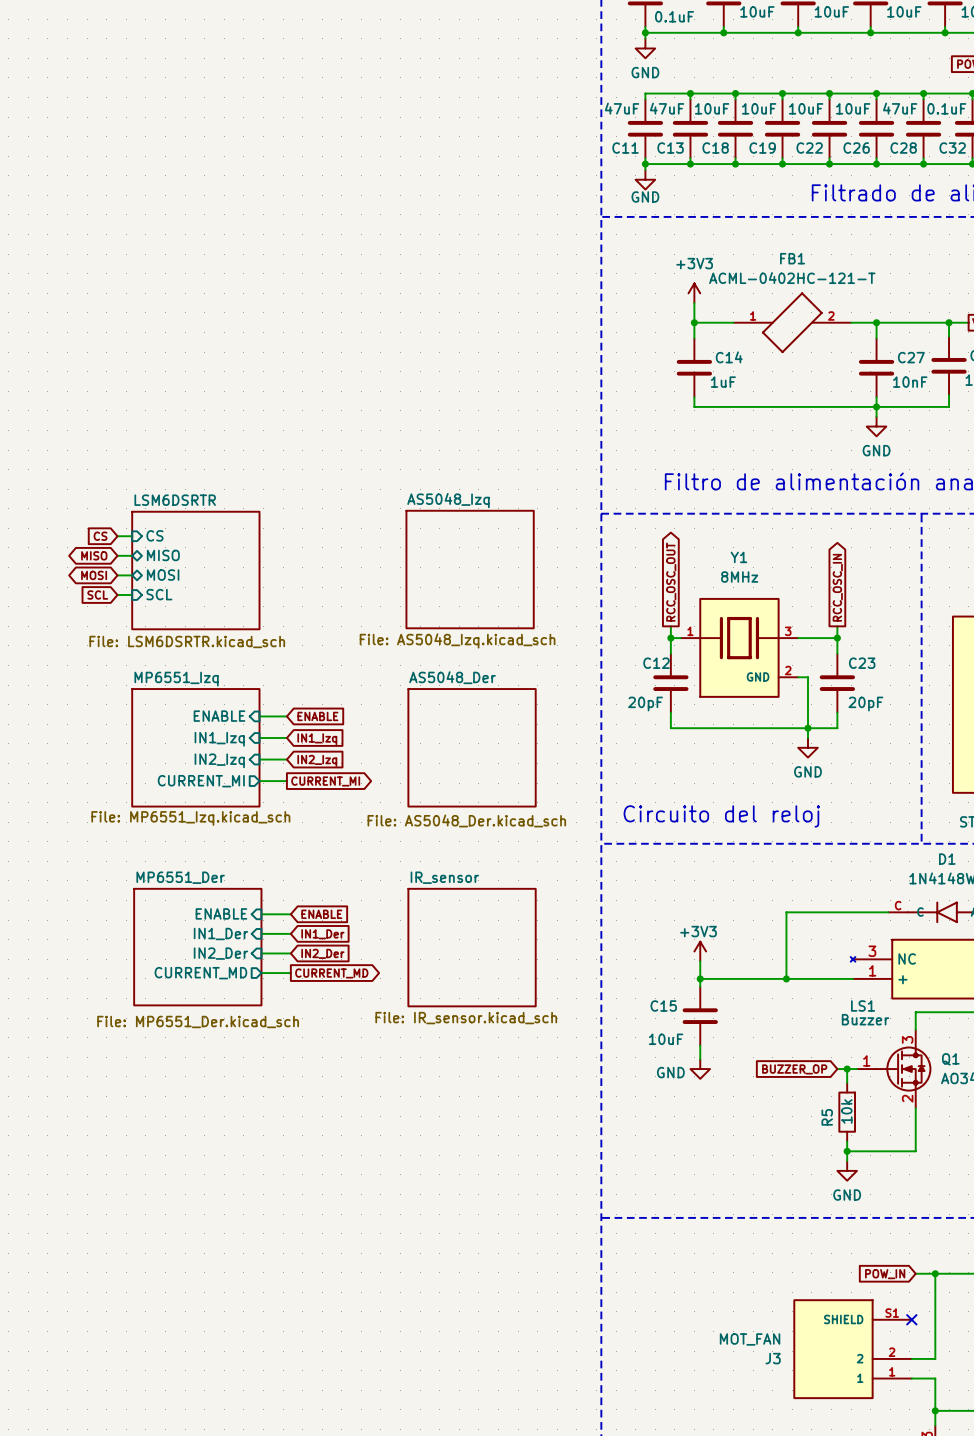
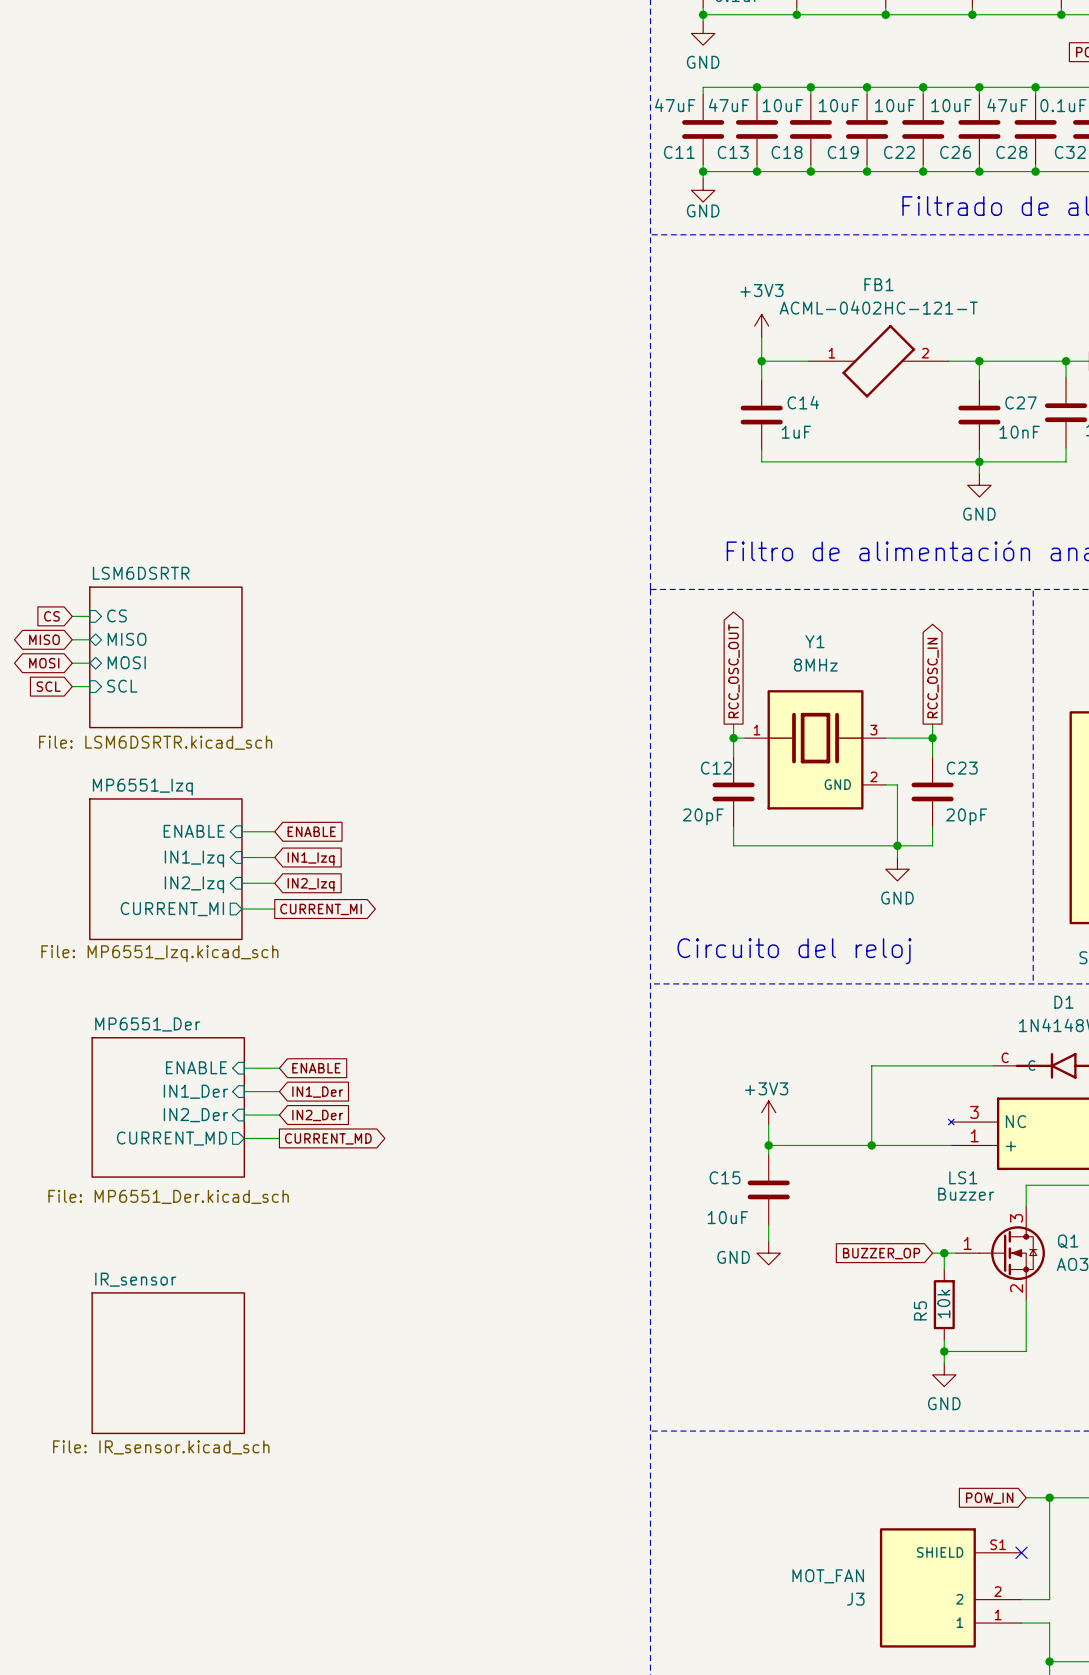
sheet AS5048_Izq: File: AS5048_Izq.kicad_sch (470, 569) -> none
sheet AS5048_Der: File: AS5048_Der.kicad_sch (472, 747) -> none
sheet IR_sensor: File: IR_sensor.kicad_sch (472, 947) -> none
sheet IR_sensor: none -> File: IR_sensor.kicad_sch (168, 1363)

